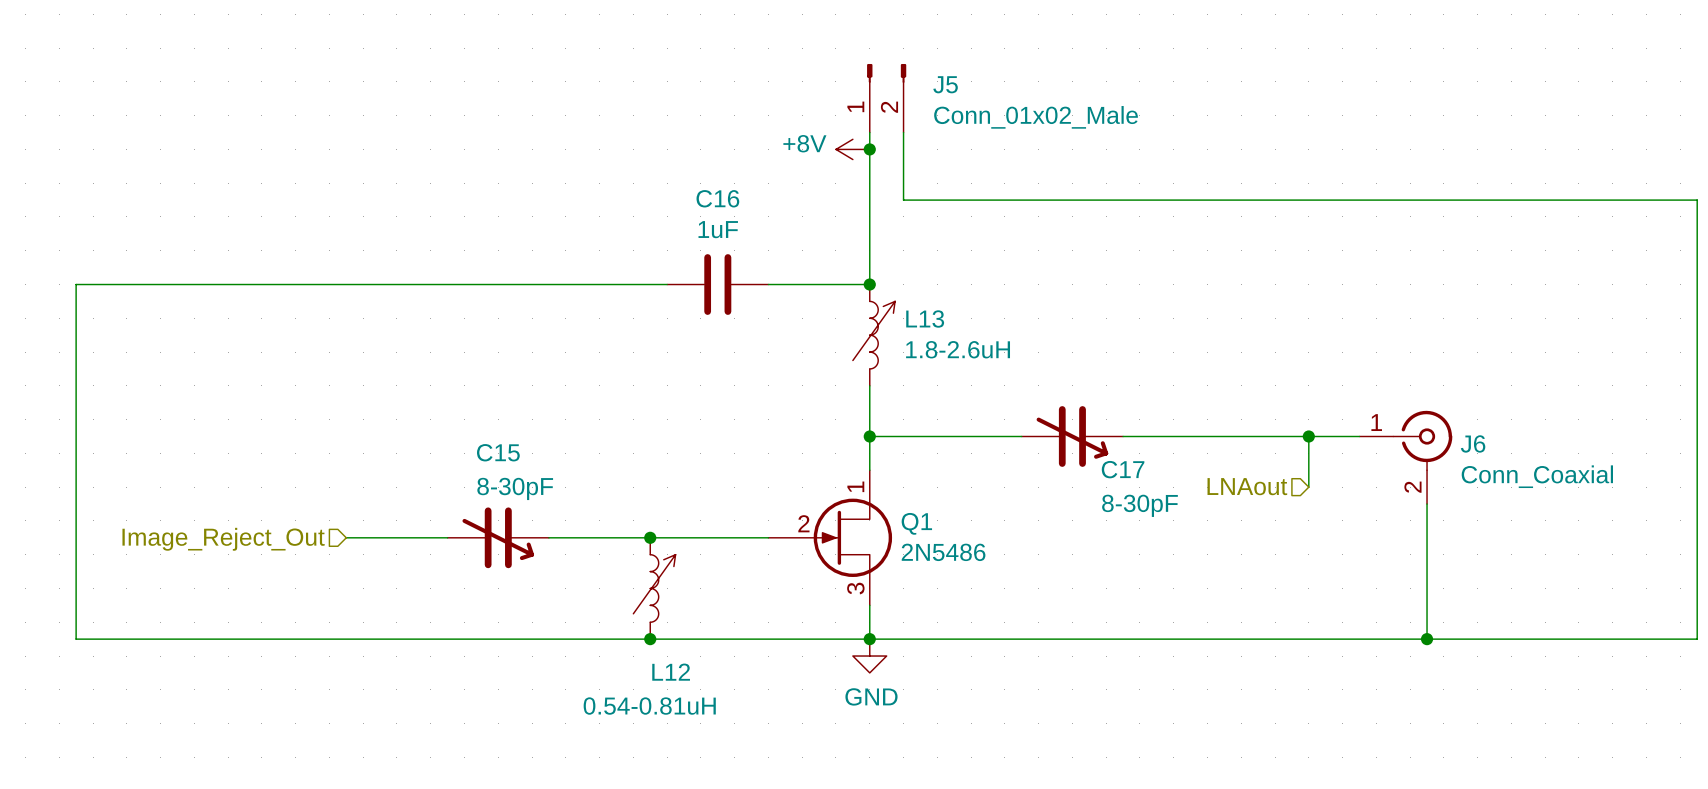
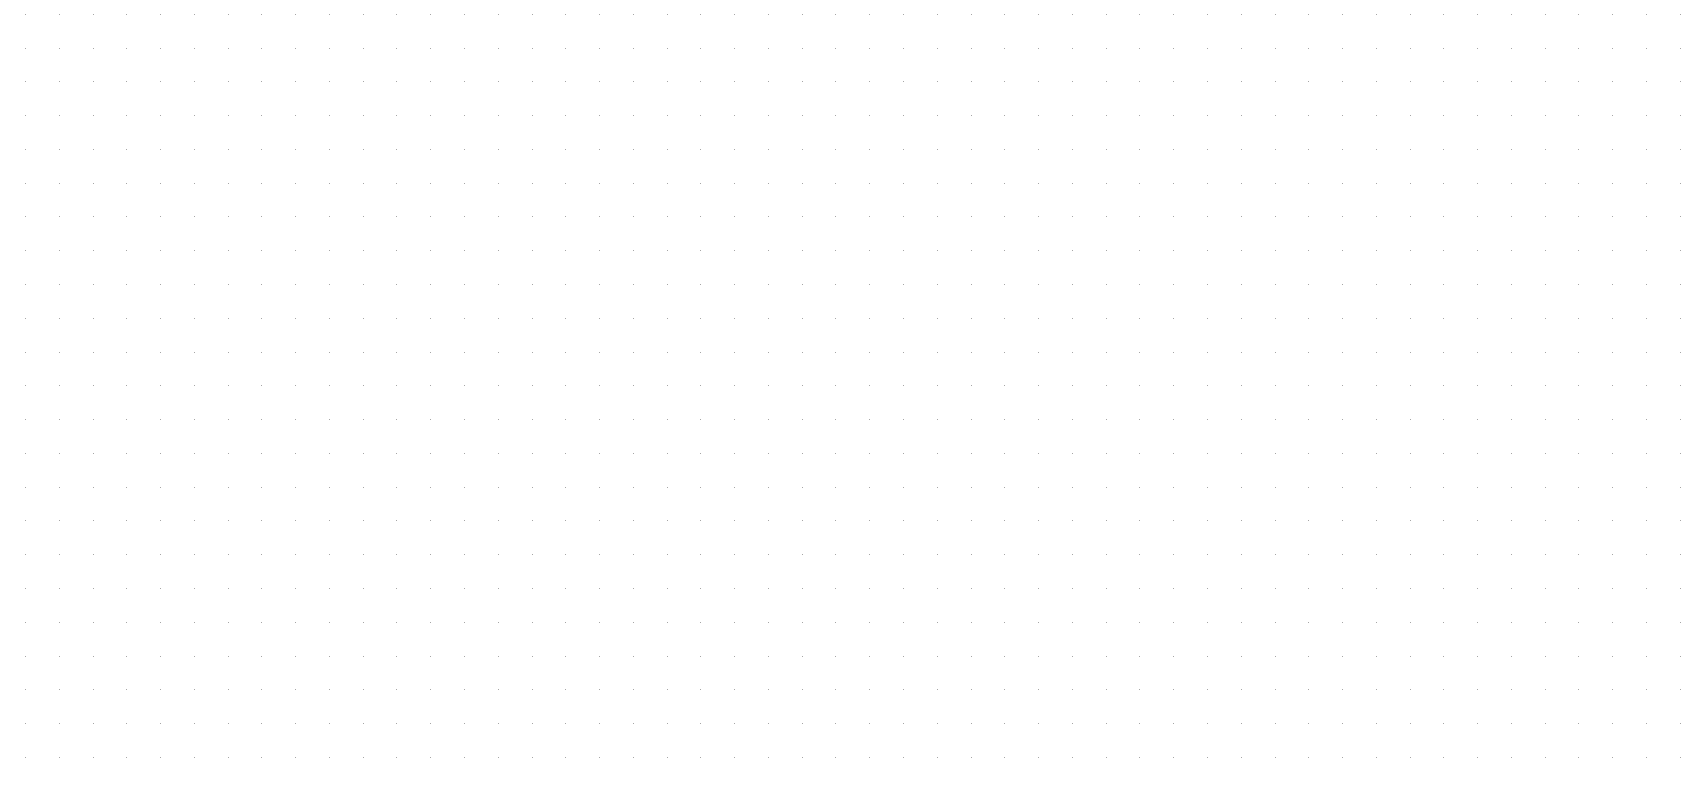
J5: Conn_01x02_Male (886, 98) -> none
wire: (869, 132) (869, 284) (768, 284) -> none
wire: (903, 132) (903, 200) (1697, 200) (1697, 639) (76, 639) (76, 284) (667, 284) -> none
power symbol: +8V (852, 149) -> none
junction: (869, 149) -> none
C16: 1uF (717, 284) -> none
junction: (869, 284) -> none
L13: 1.8-2.6uH (873, 335) -> none
wire: (869, 385) (869, 470) -> none
wire: (869, 436) (1021, 436) -> none
junction: (869, 436) -> none
C17: 8-30pF (1072, 436) -> none
wire: (1123, 436) (1359, 436) -> none
wire: (1308, 436) (1308, 487) -> none
junction: (1308, 436) -> none
J6: Conn_Coaxial (1405, 457) -> none
hierarchical label: LNAout (1247, 486) -> none
wire: (1427, 504) (1427, 639) -> none
wire: (346, 537) (447, 537) -> none
C15: 8-30pF (498, 537) -> none
wire: (548, 537) (768, 537) -> none
junction: (650, 537) -> none
Q1: 2N5486 (830, 537) -> none
hierarchical label: Image_Reject_Out (223, 539) -> none
L12: 0.54-0.81uH (654, 588) -> none
wire: (869, 605) (869, 639) -> none
junction: (650, 639) -> none
junction: (869, 639) -> none
junction: (1427, 639) -> none
power symbol: GND (869, 656) -> none

